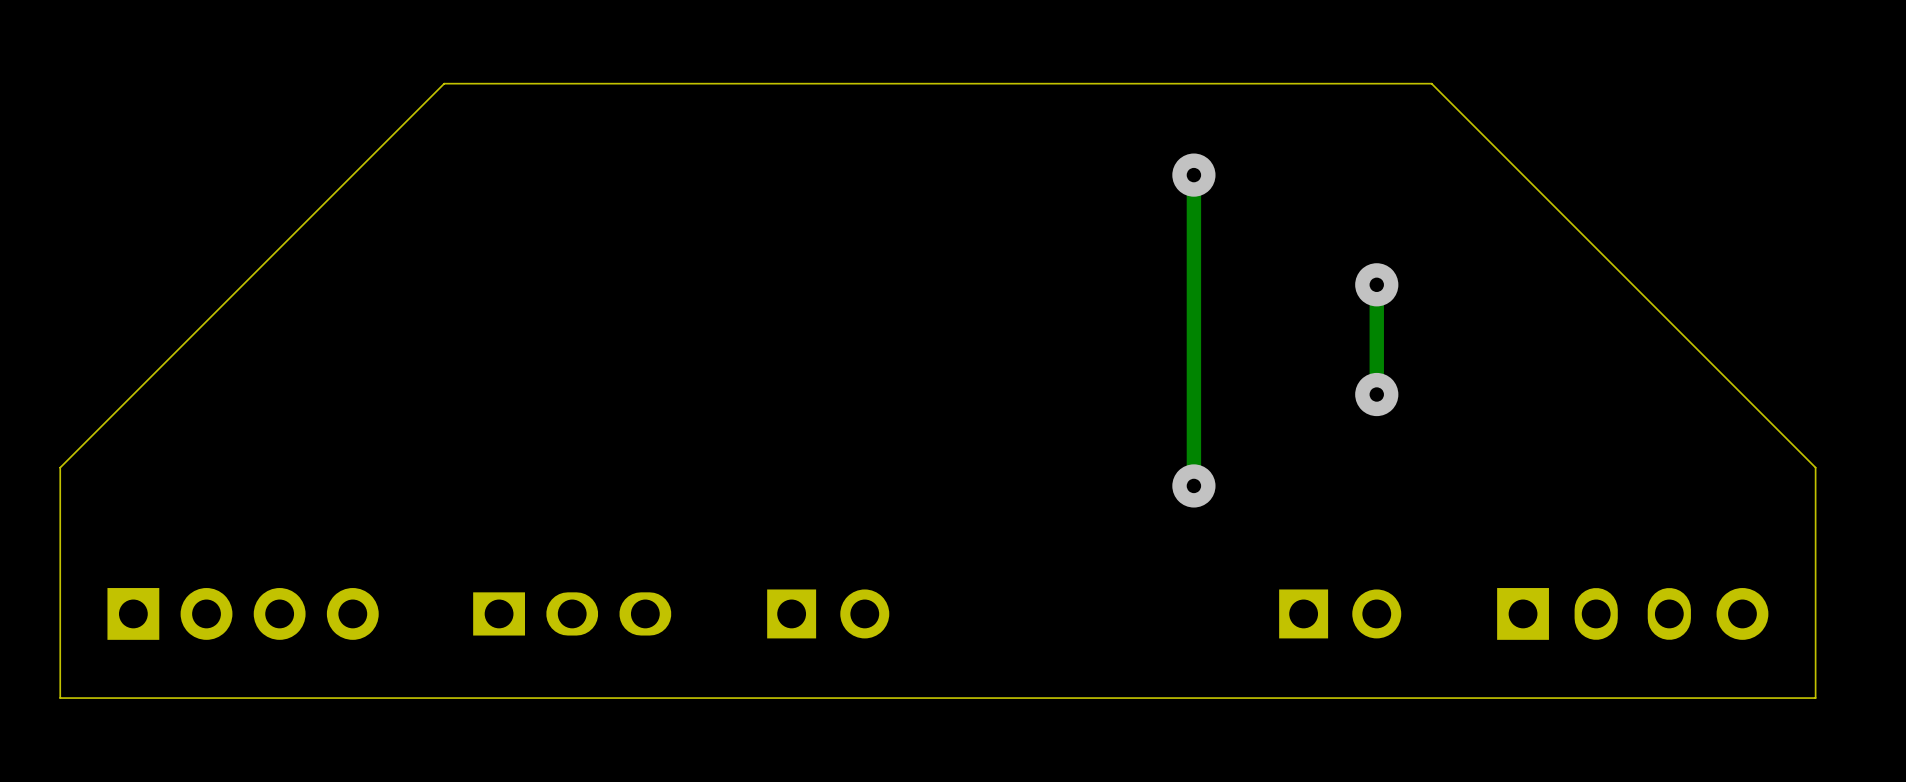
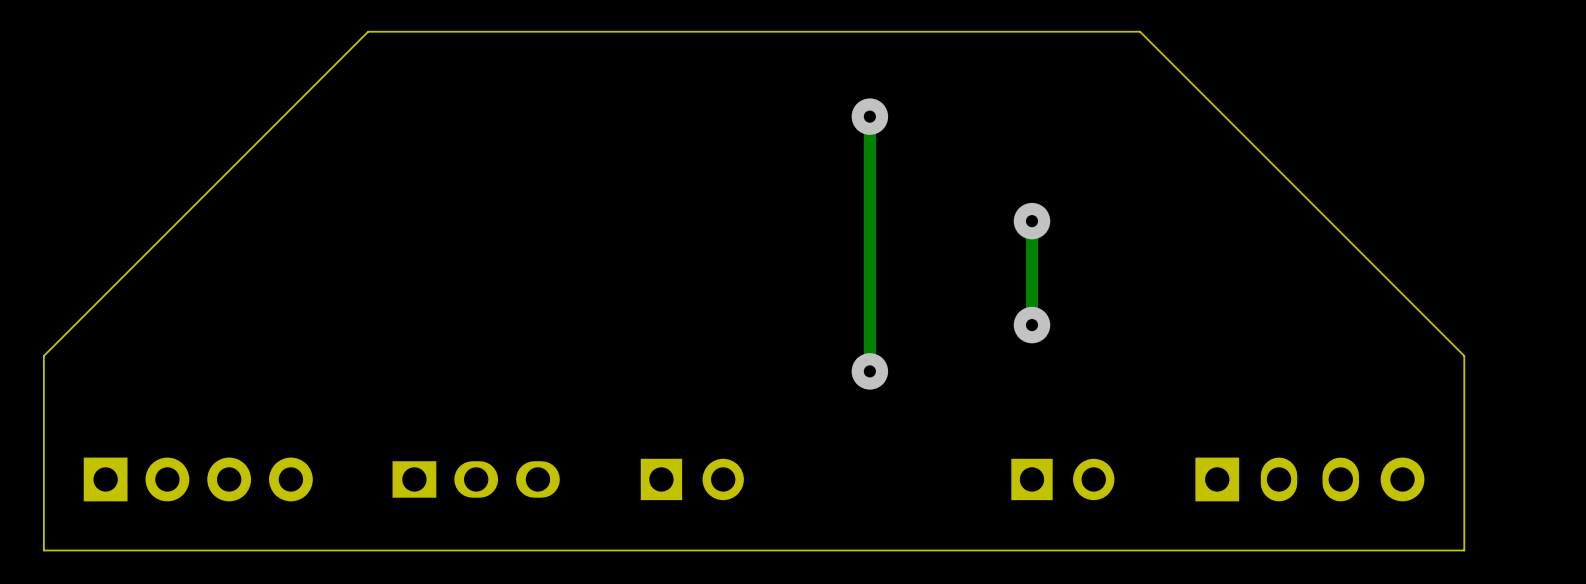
board edge: (1358, 83) (1431, 83) (1815, 467) (1815, 698) (1742, 698) -> (1140, 31) (1464, 355) (1464, 550)
track: (1193, 175) (1193, 485) -> none
via: (1193, 175) -> none
track: none -> (869, 116) (869, 371)
via: none -> (869, 116)
track: (1376, 284) (1376, 394) -> none
via: (1376, 284) -> none
track: none -> (1031, 221) (1031, 325)
via: none -> (1031, 221)
via: (1376, 394) -> none
via: none -> (869, 371)
via position: (1193, 485) -> (1031, 325)
part position: (1340, 613) -> (1062, 479)
part position: (1632, 613) -> (1309, 479)

